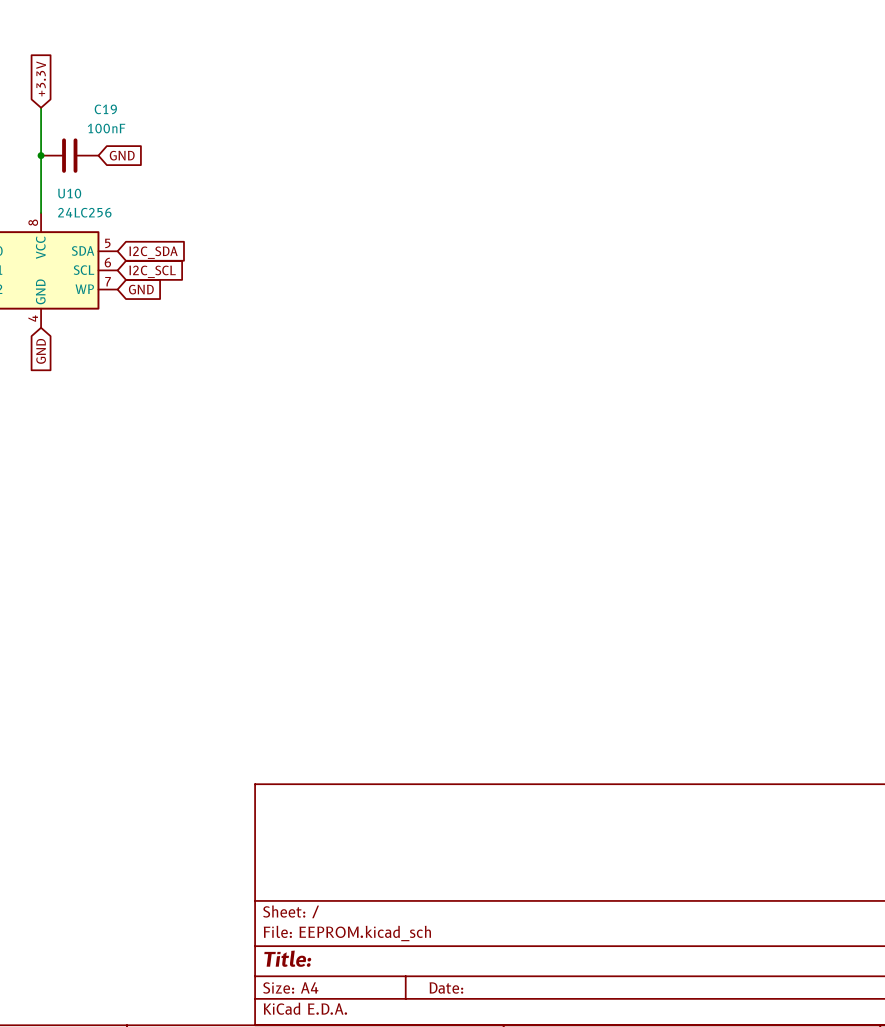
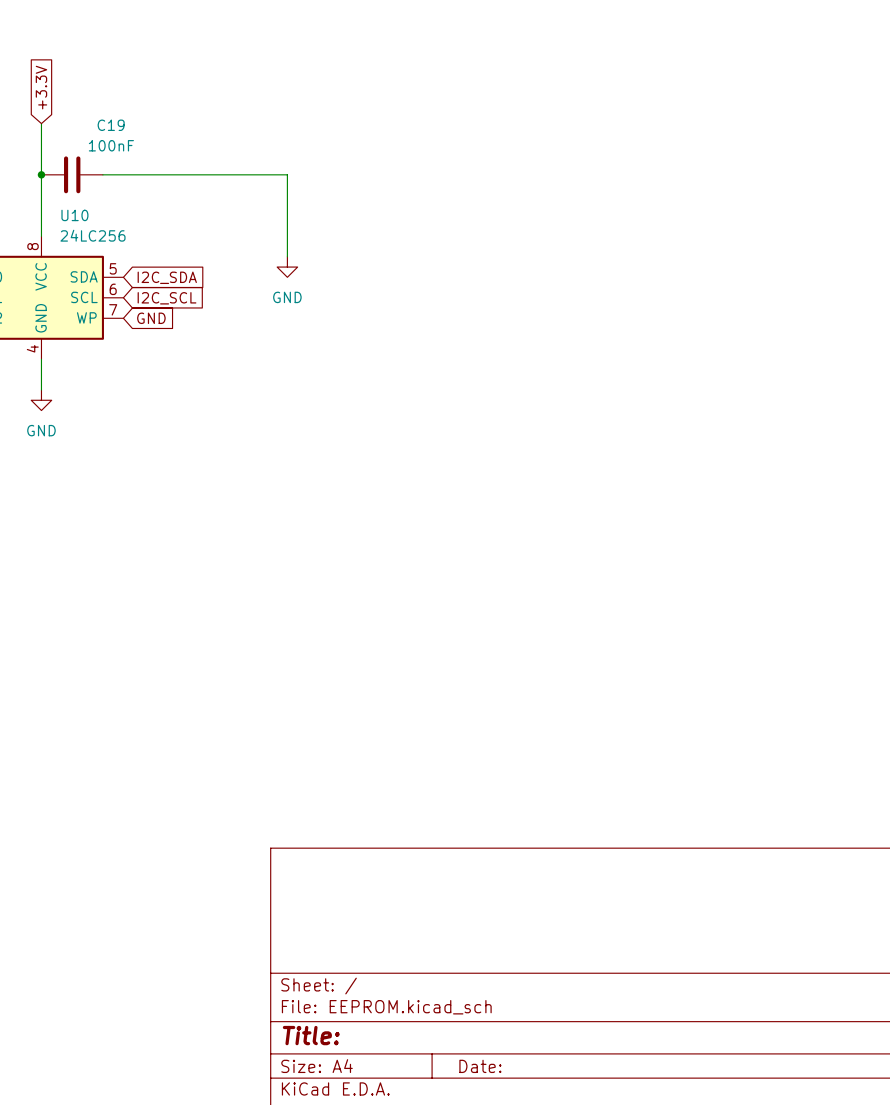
wire: none -> (102, 174) (287, 174) (287, 256)
global label: GND (122, 155) -> none
power symbol: none -> GND (287, 267)
wire: none -> (41, 359) (41, 390)
global label: GND (41, 351) -> none
power symbol: none -> GND (41, 400)

